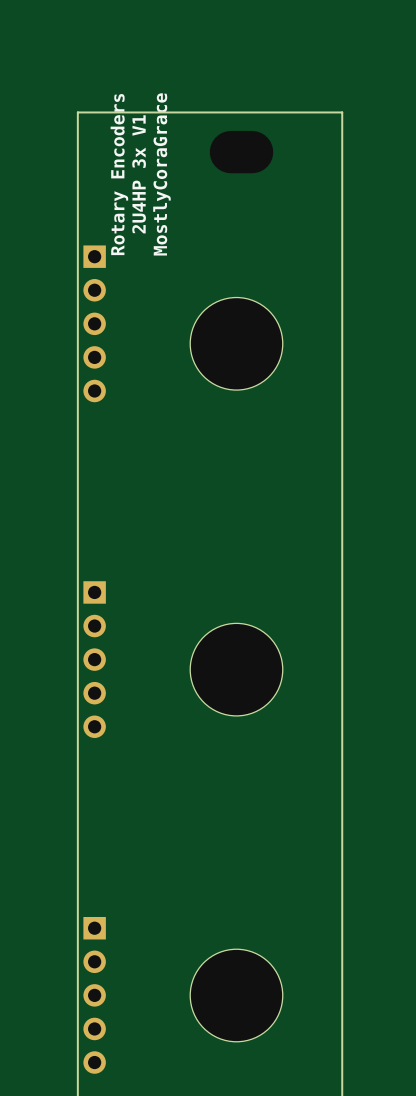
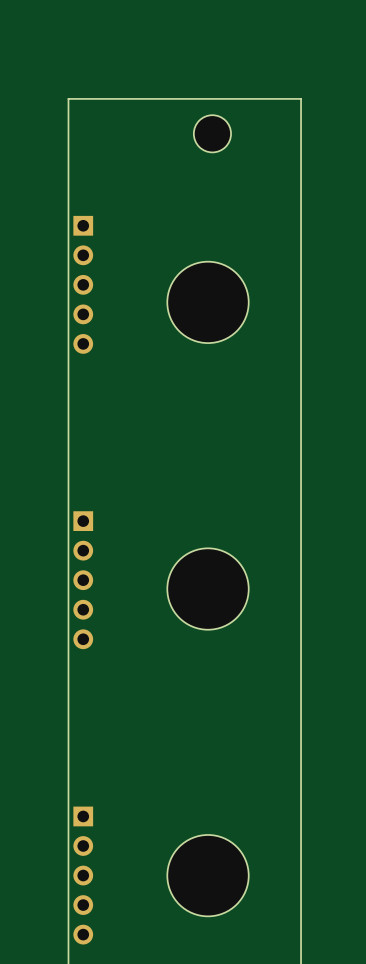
part footprint: [209, 130, 274, 174] -> [193, 115, 232, 153]
text: Rotary Encoders (119, 174) -> none
text: 2U4HP 3x V1 (139, 174) -> none
text: MostlyCoraGrace (161, 174) -> none

